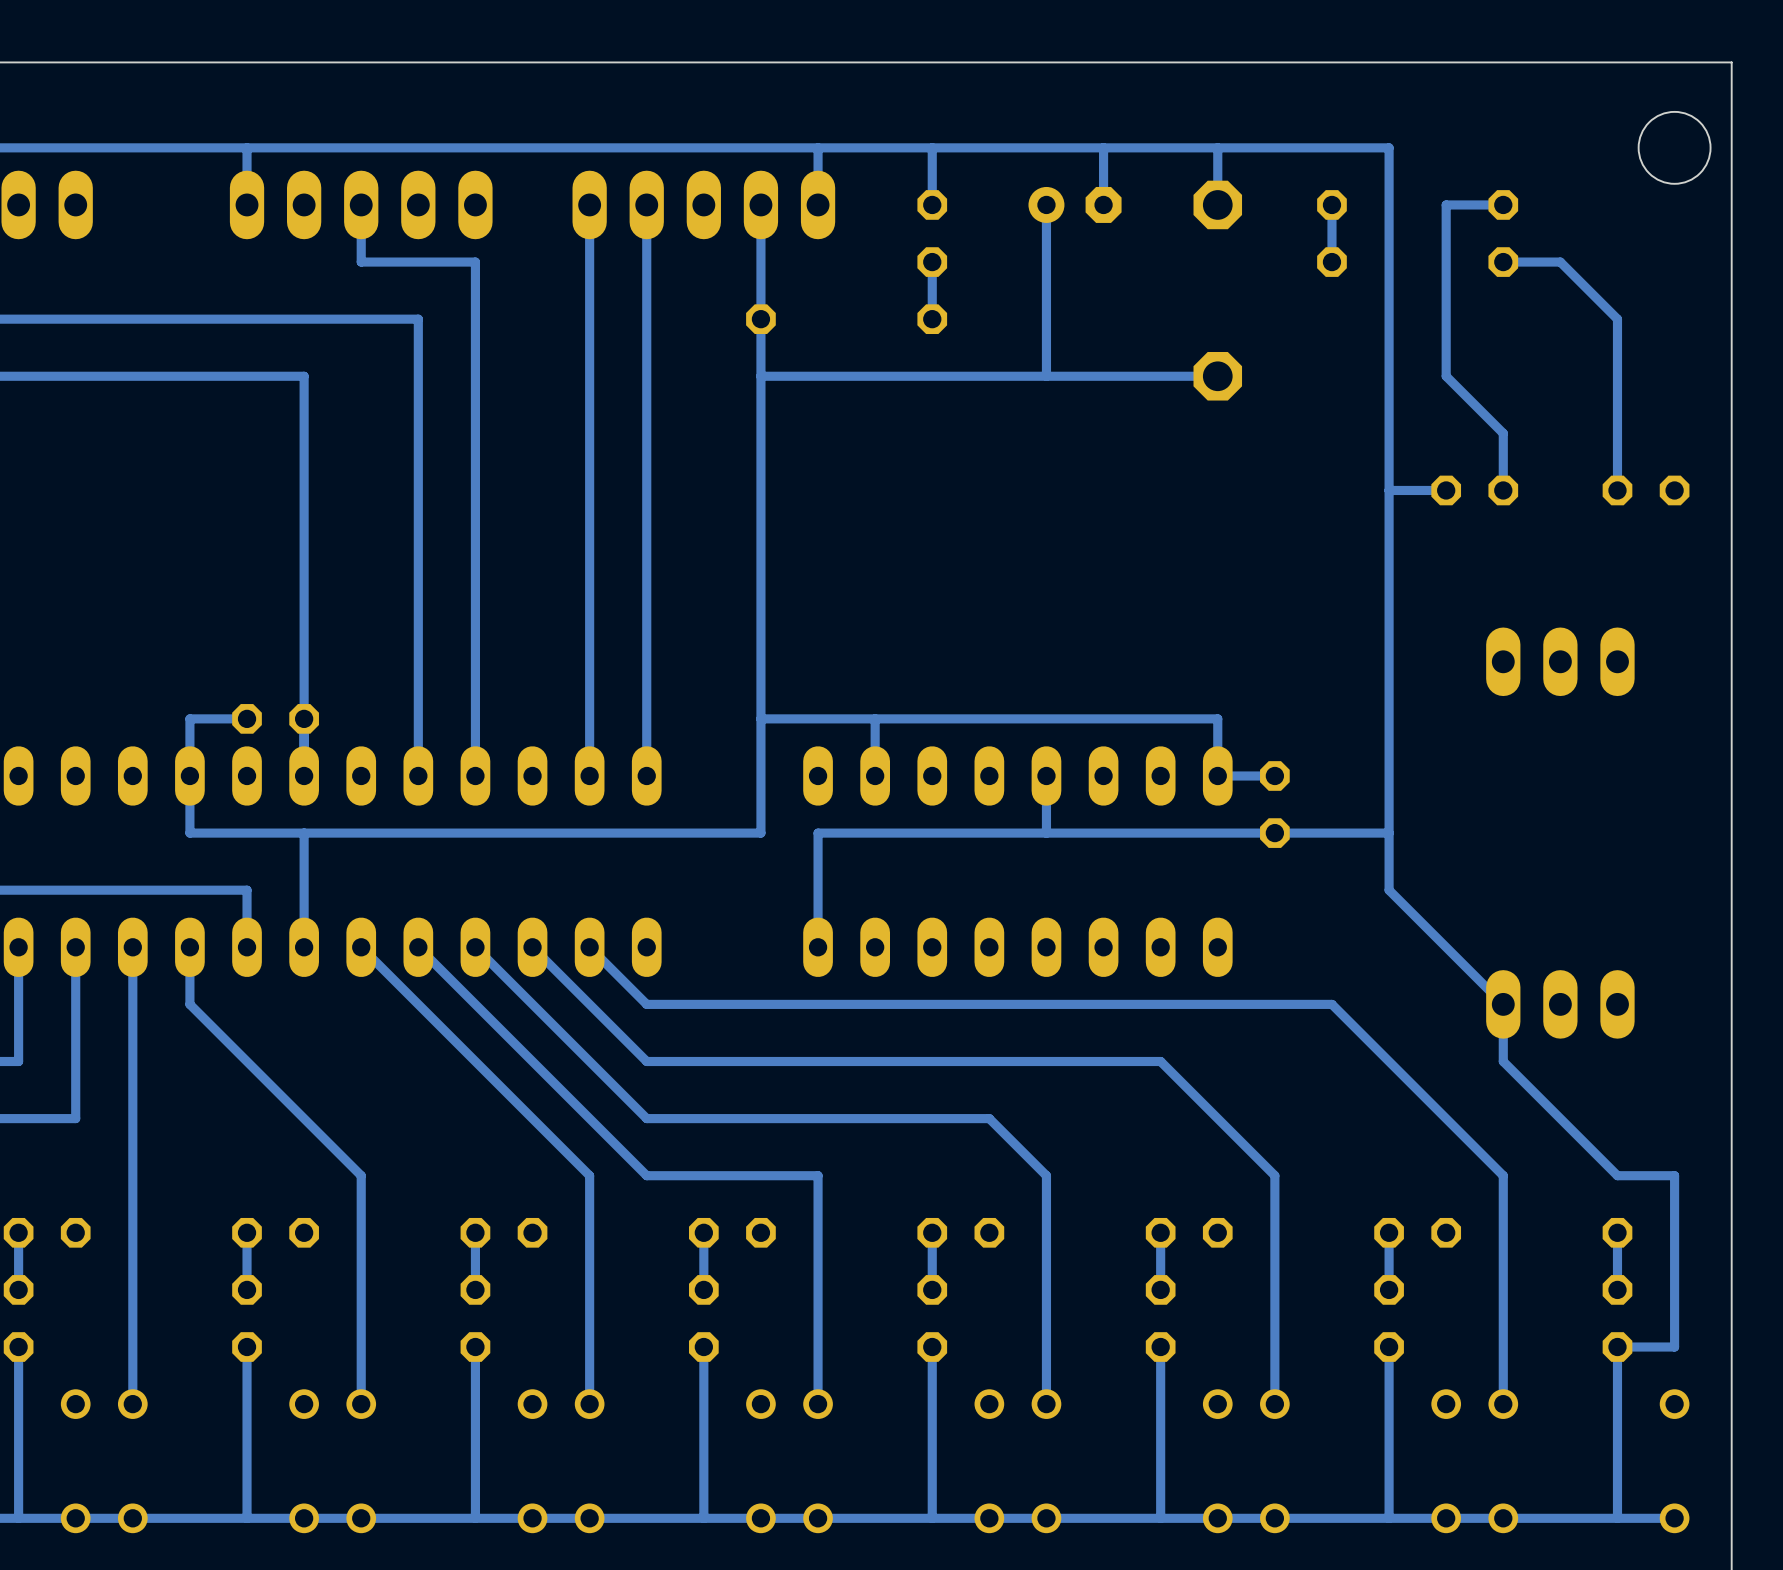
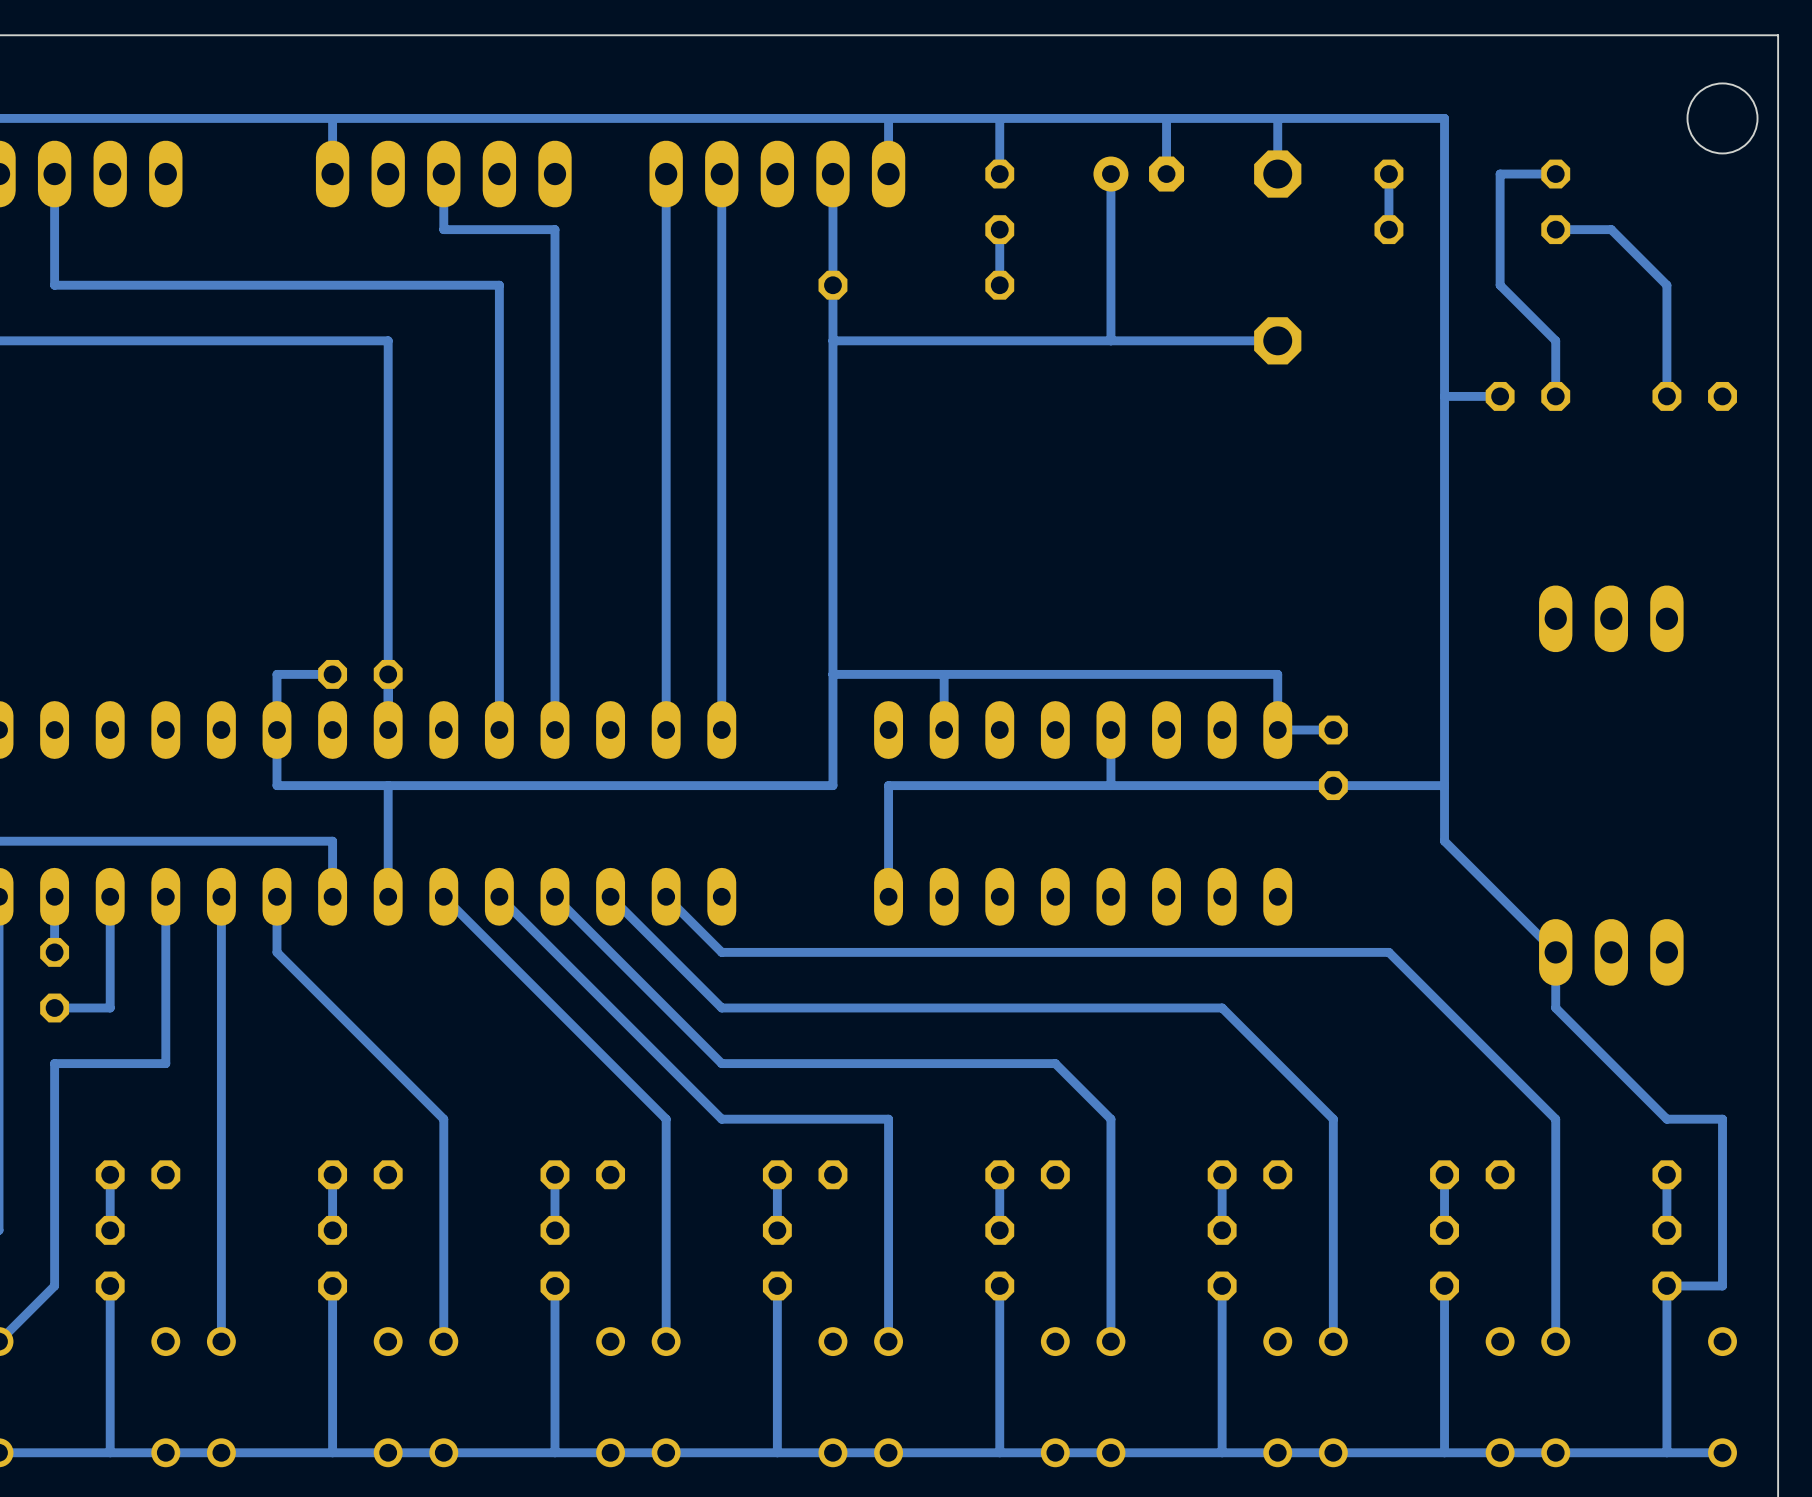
track: (1446, 319) (1446, 376) (1503, 433) (1503, 490) -> (1500, 285) (1555, 340) (1555, 396)
track: (1617, 433) (1617, 490) -> none
track: (1446, 490) (1389, 490) -> (1500, 396) (1444, 396)
part position: (1474, 490) -> (1527, 396)
part position: (1646, 490) -> (1694, 396)

